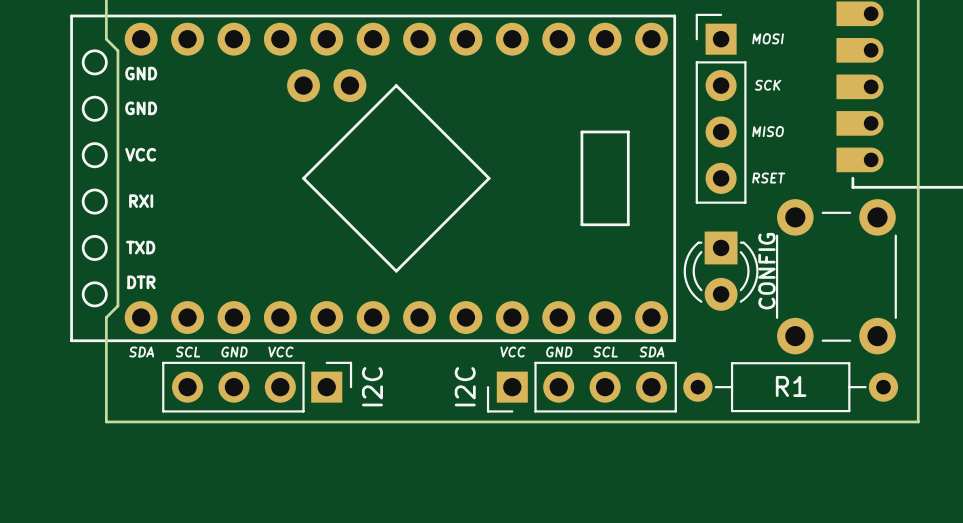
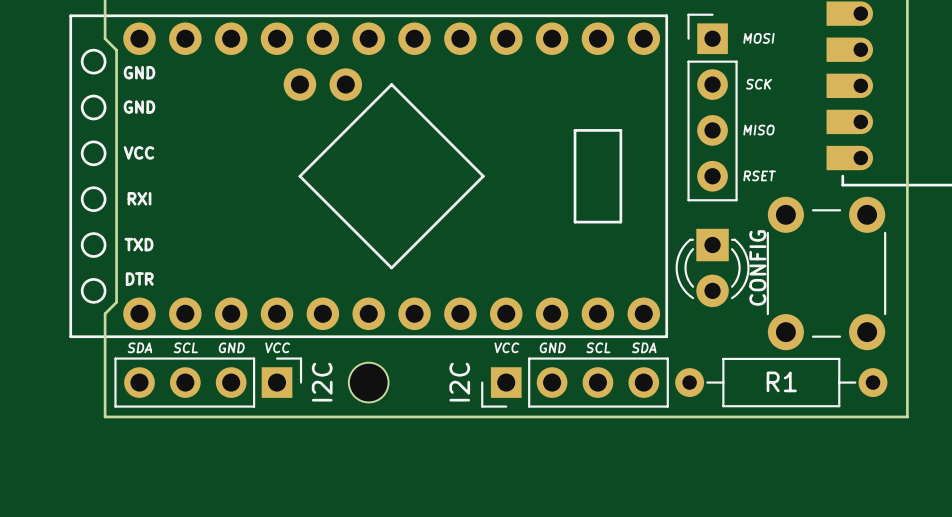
text position: I2C (372, 386) -> I2C (322, 382)
part position: (257, 387) -> (208, 382)
part: none -> (368, 382)

